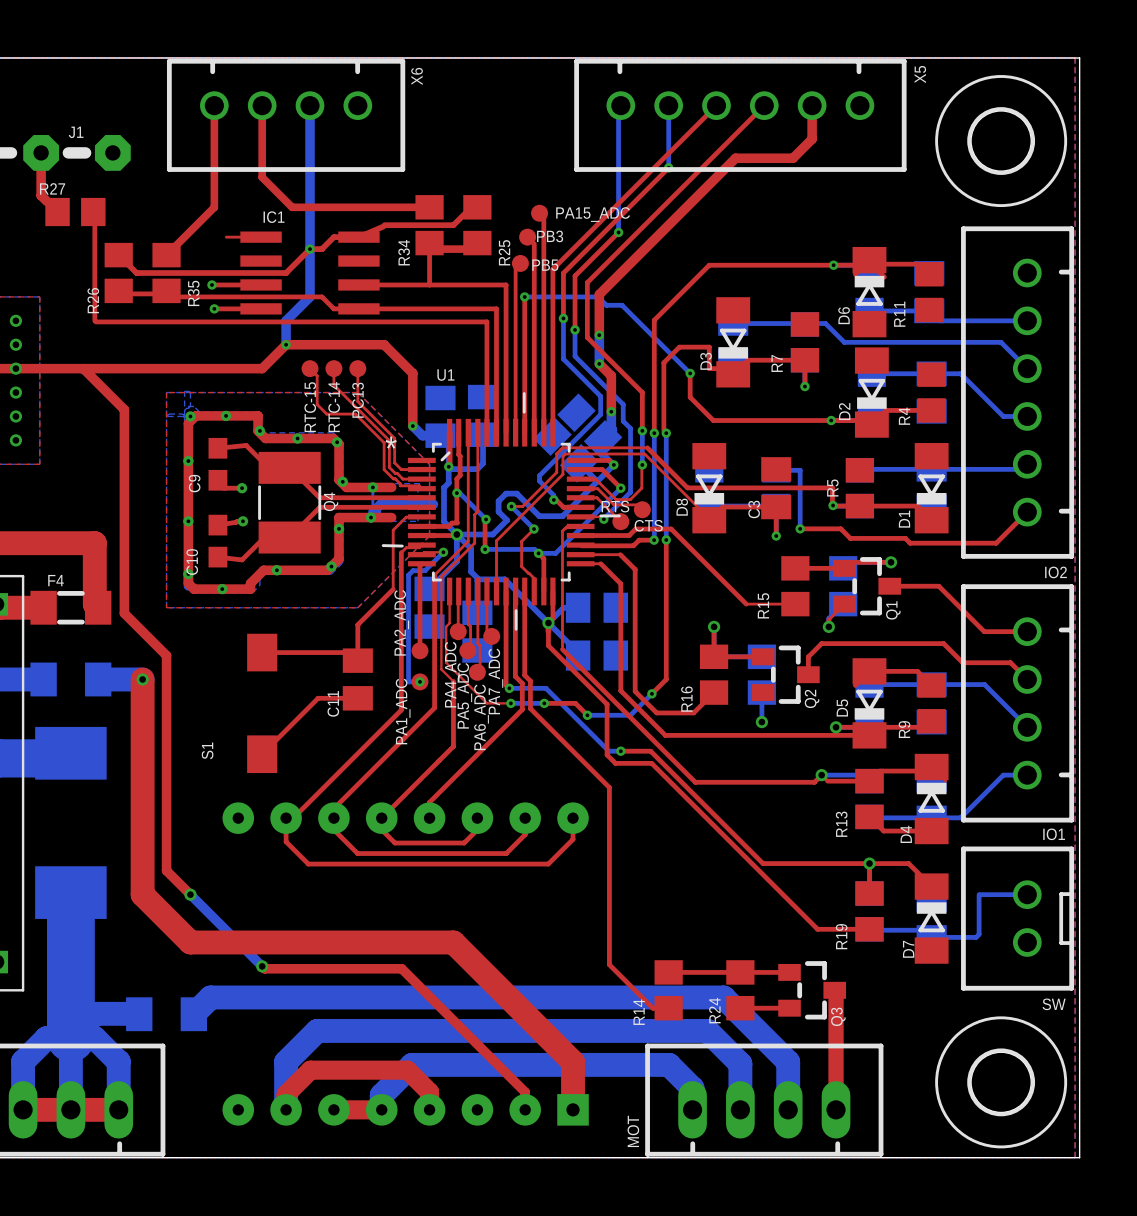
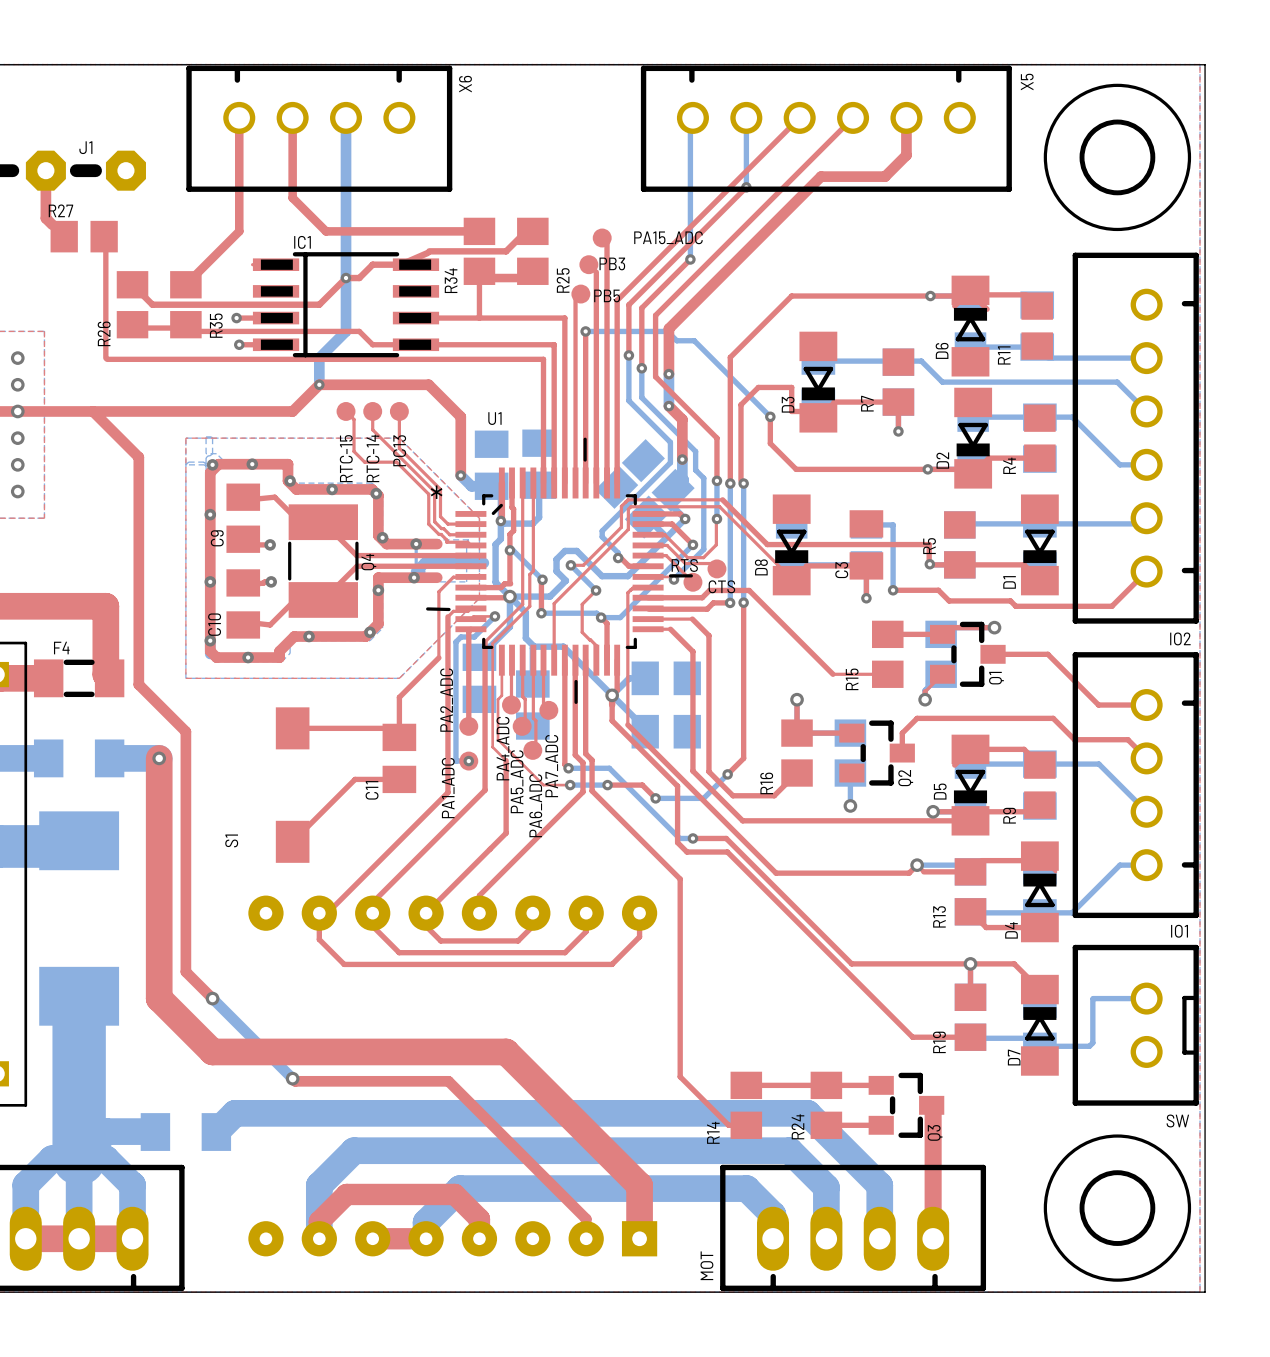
IC1 footprint: [240, 231, 380, 315] -> [252, 252, 440, 358]
C9 footprint: [208, 437, 228, 491] -> [226, 483, 261, 553]
C10 footprint: [208, 514, 228, 568] -> [226, 569, 261, 639]

